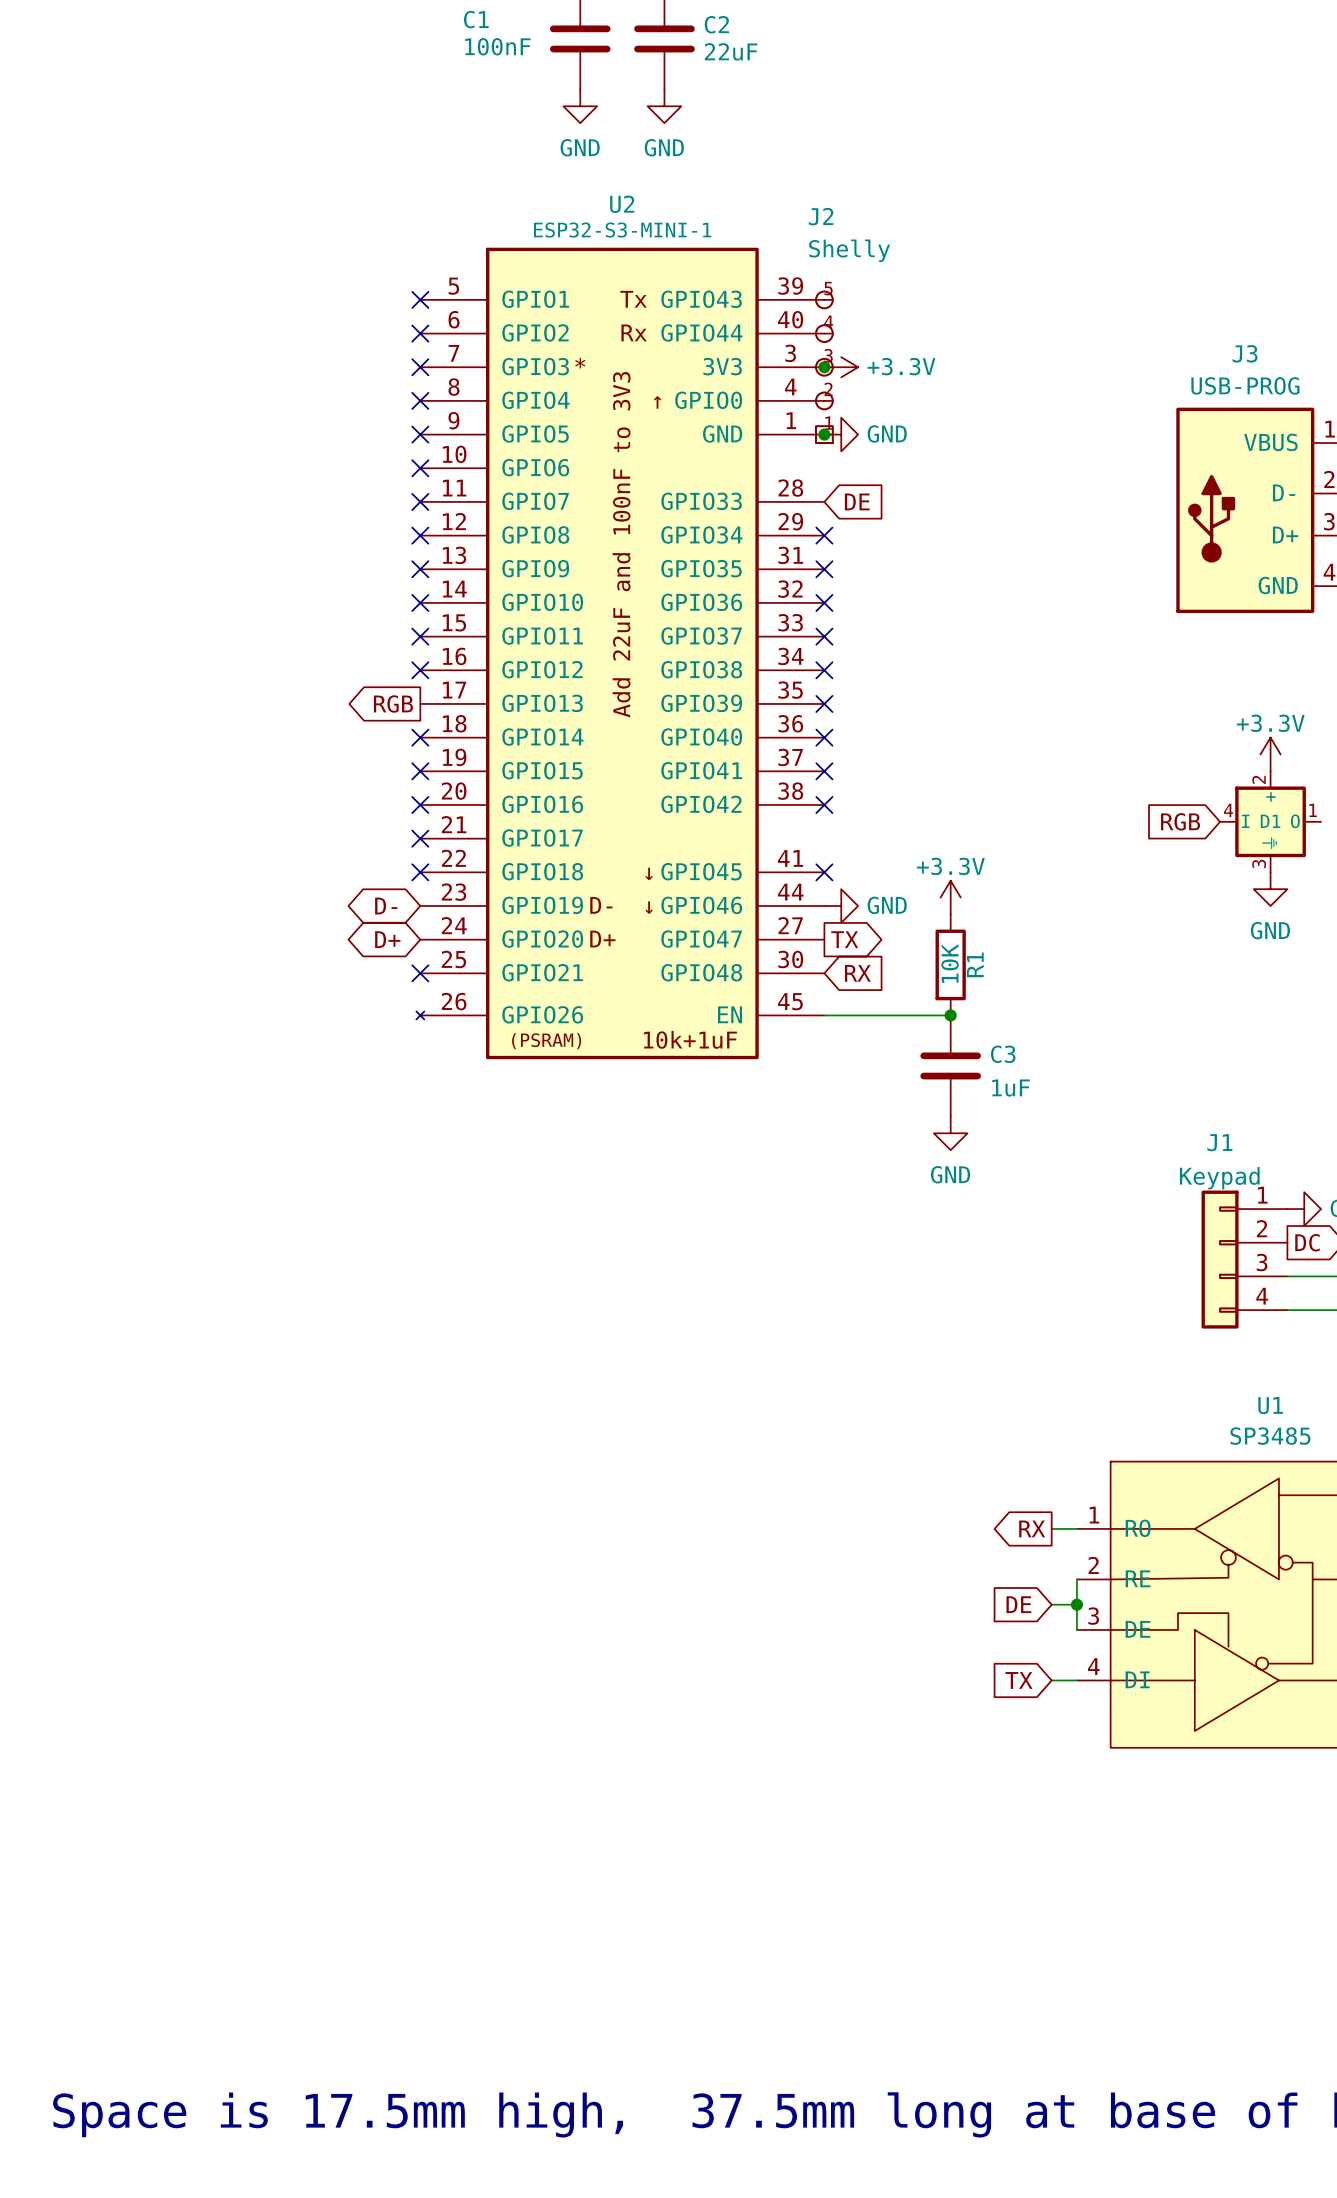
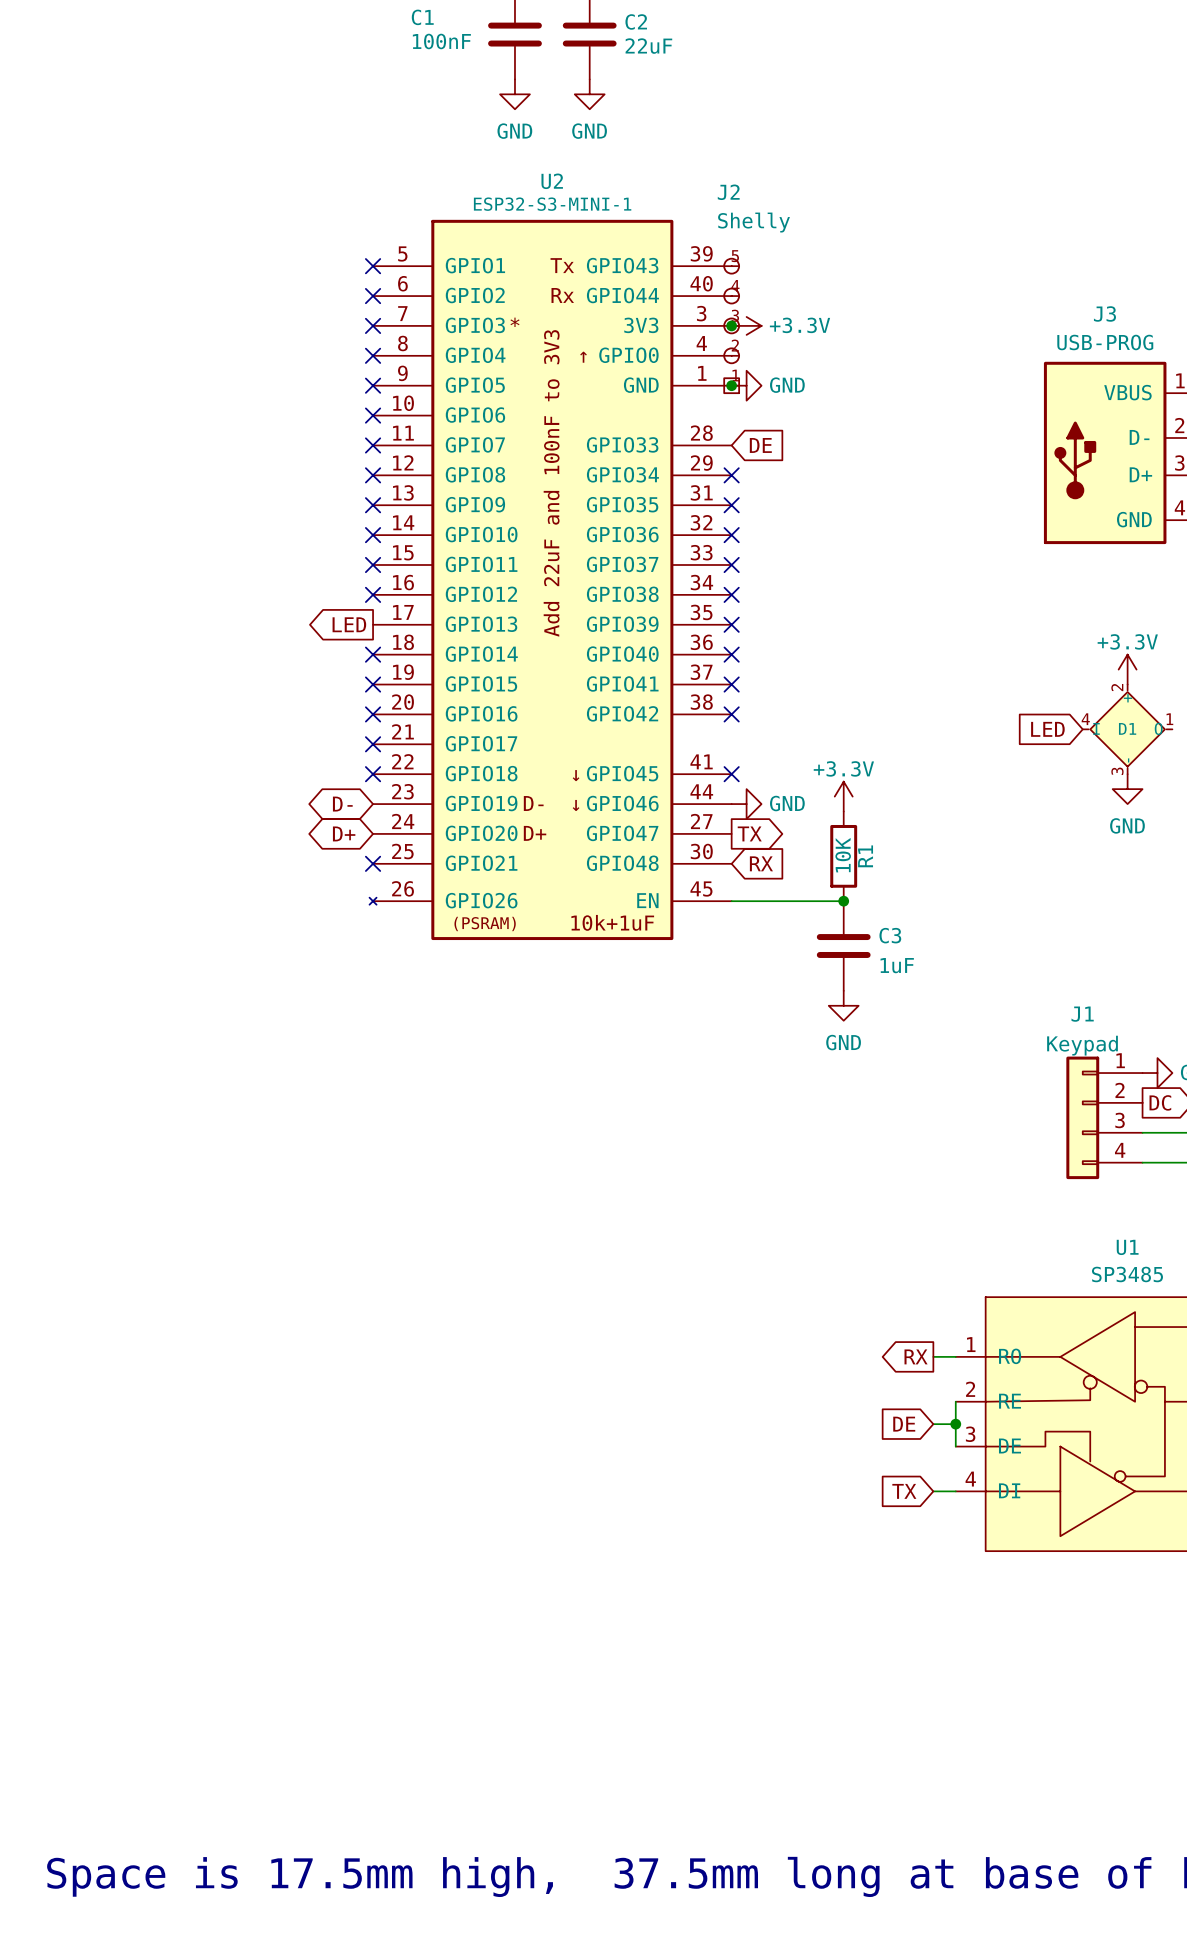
global label: RGB (393, 703) -> LED (349, 624)
D1 symbol: [1220, 771, 1322, 873] -> [1082, 684, 1173, 775]
global label: RGB (1180, 821) -> LED (1047, 729)

